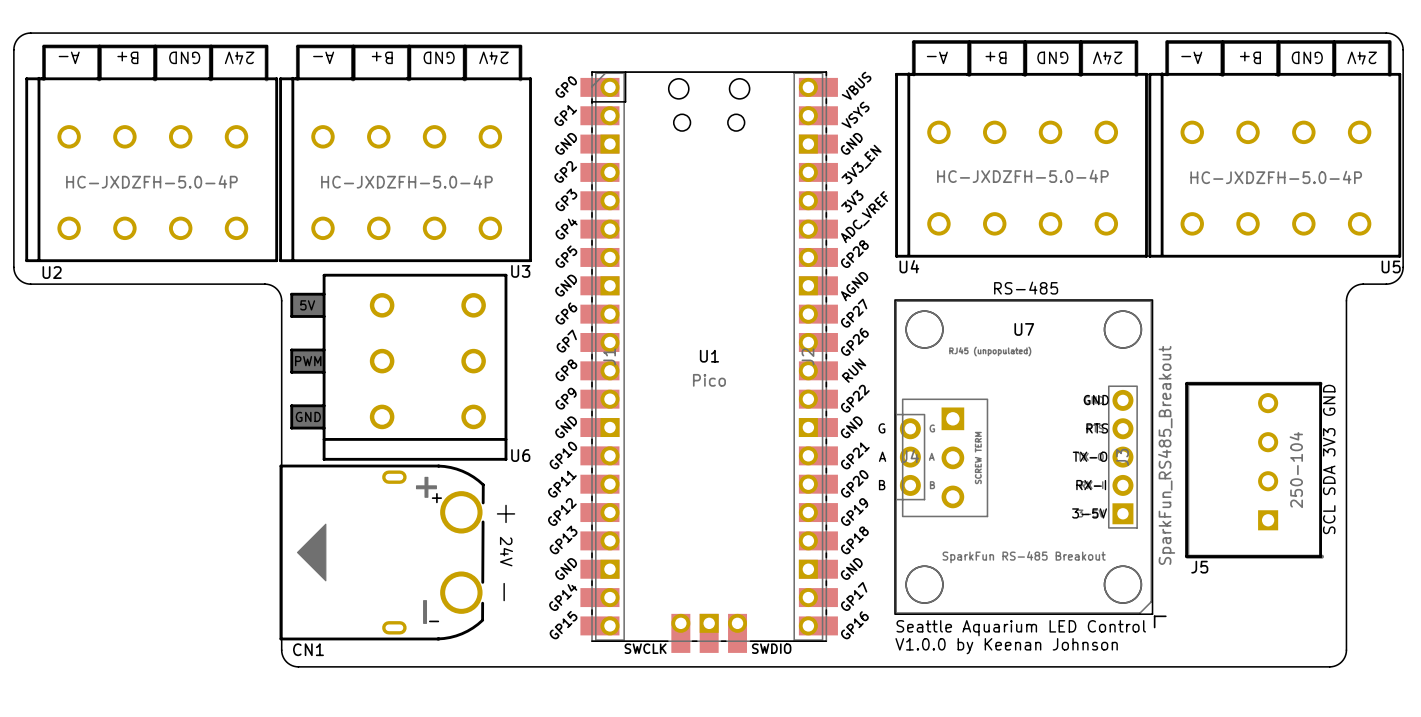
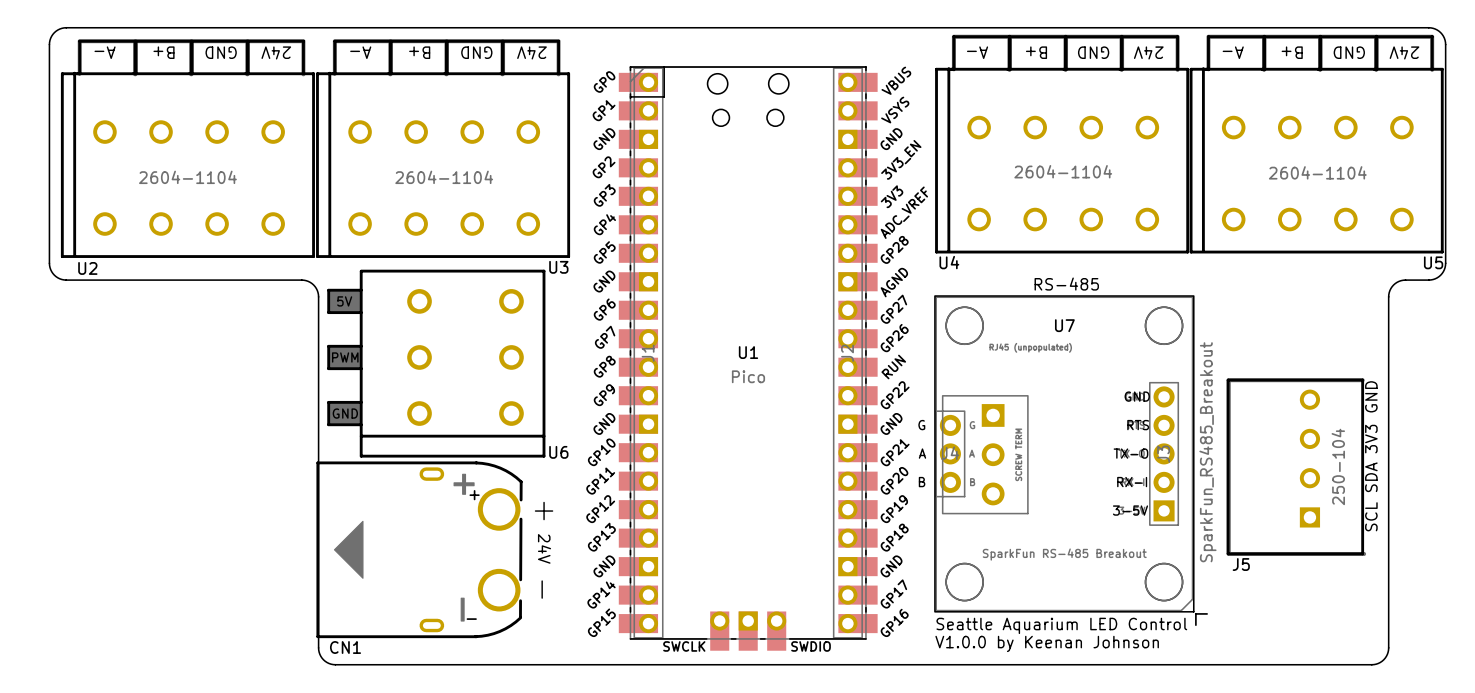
U4 value: HC-JXDZFH-5.0-4P (1022, 176) -> 2604-1104 (1063, 171)
U5 value: HC-JXDZFH-5.0-4P (1276, 177) -> 2604-1104 (1317, 172)
U2 value: HC-JXDZFH-5.0-4P (151, 181) -> 2604-1104 (187, 177)
U3 value: HC-JXDZFH-5.0-4P (406, 181) -> 2604-1104 (444, 177)

